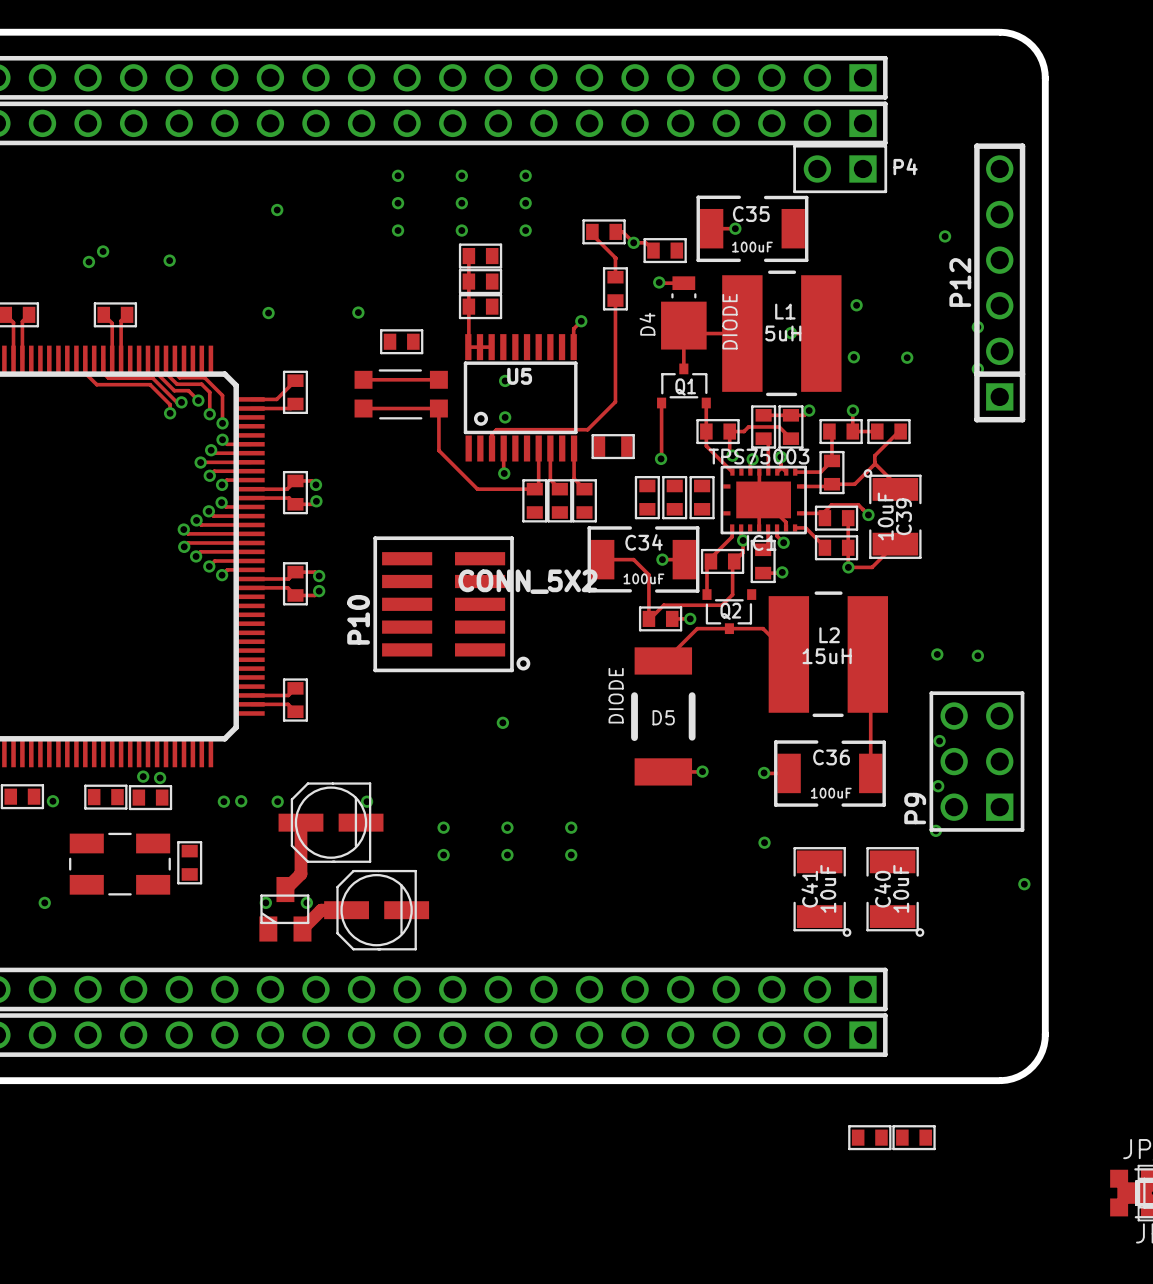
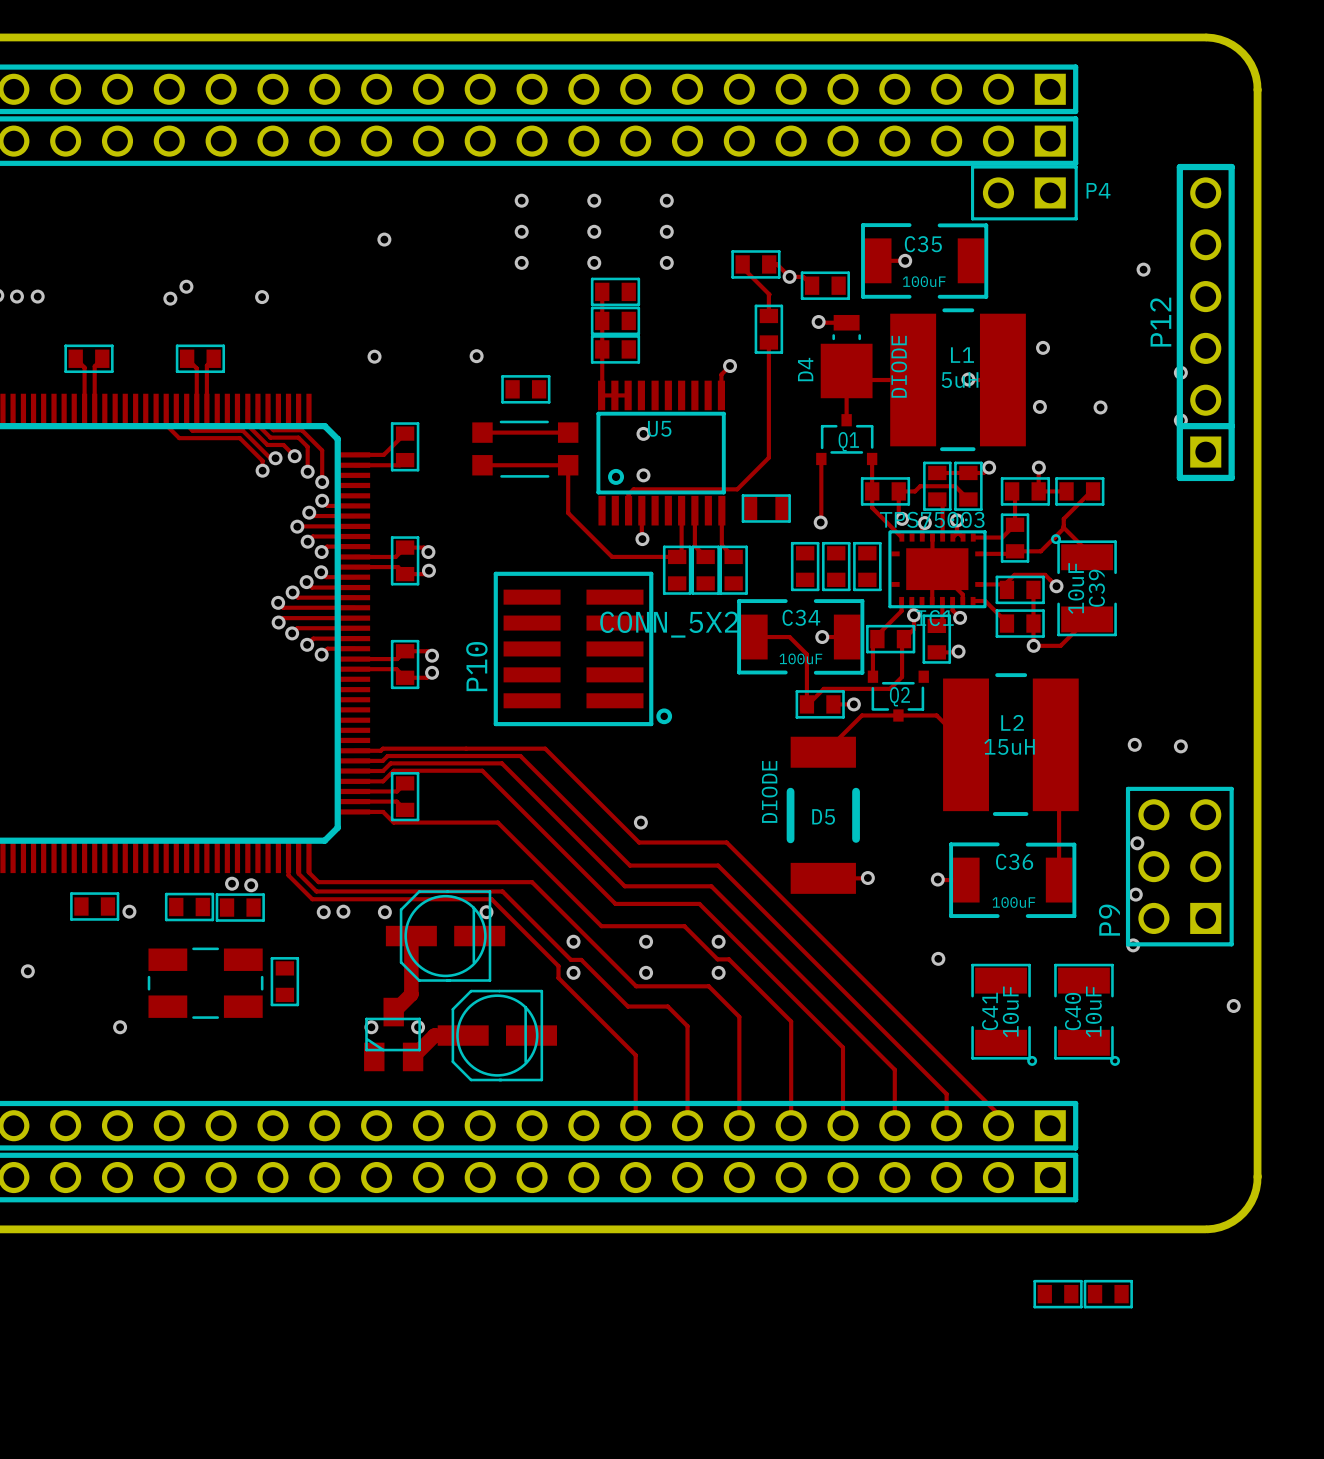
P10 position: (451, 604) -> (582, 648)
track: none -> (354, 750) (380, 750) (382, 748) (545, 748) (639, 842) (726, 842) (998, 1114) (998, 1125)
track: none -> (354, 760) (382, 760) (387, 756) (520, 756) (630, 865) (718, 865) (946, 1094) (946, 1125)
track: none -> (354, 771) (383, 771) (390, 763) (501, 763) (624, 886) (711, 886) (894, 1069) (894, 1125)
track: none -> (354, 781) (383, 781) (393, 770) (482, 770) (615, 903) (699, 903) (842, 1047) (842, 1125)
track: none -> (354, 811) (383, 811) (393, 822) (497, 822) (601, 926) (684, 926) (717, 959) (728, 959) (791, 1021) (791, 1125)
track: none -> (288, 857) (288, 875) (312, 899) (491, 899) (558, 966) (558, 978) (635, 1055) (635, 1125)
track: none -> (298, 857) (298, 873) (316, 891) (502, 891) (570, 959) (581, 959) (627, 1006) (667, 1006) (687, 1026) (687, 1125)
track: none -> (308, 857) (308, 872) (318, 882) (532, 882) (636, 986) (708, 986) (739, 1016) (739, 1125)

